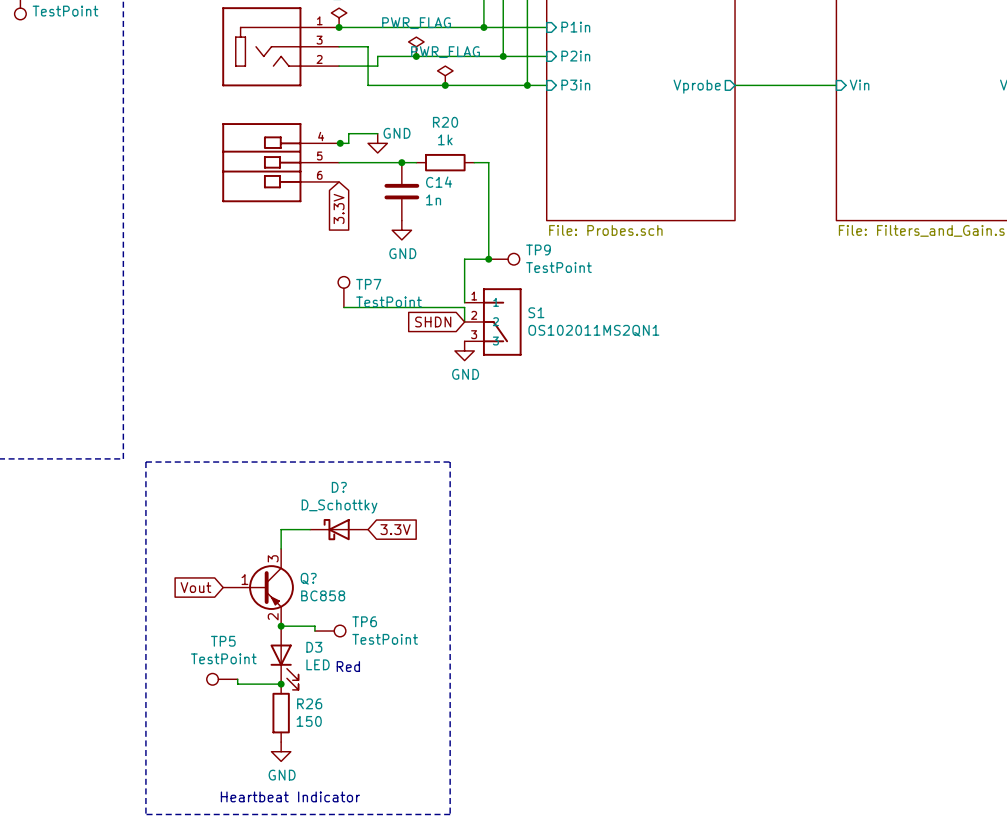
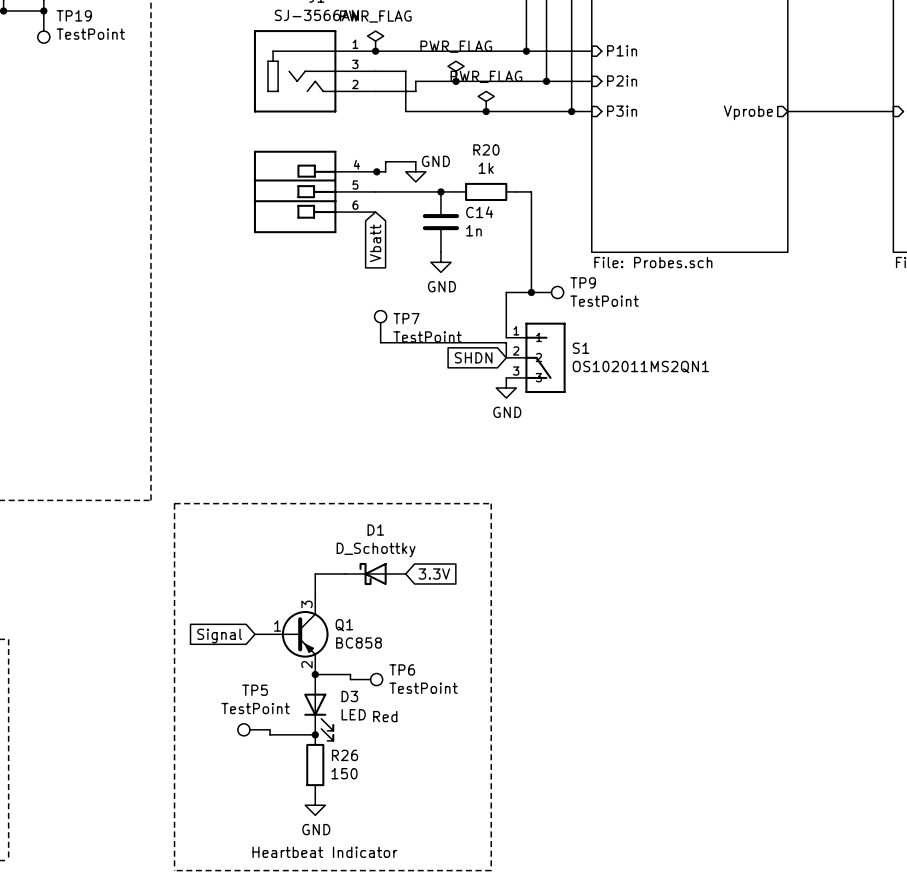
global label: 3.3V (339, 209) -> Vbatt (375, 243)
D? name: D? (339, 487) -> D1 (375, 529)
Q? name: Q? (308, 578) -> Q1 (344, 625)
global label: Vout (195, 587) -> Signal (219, 636)

